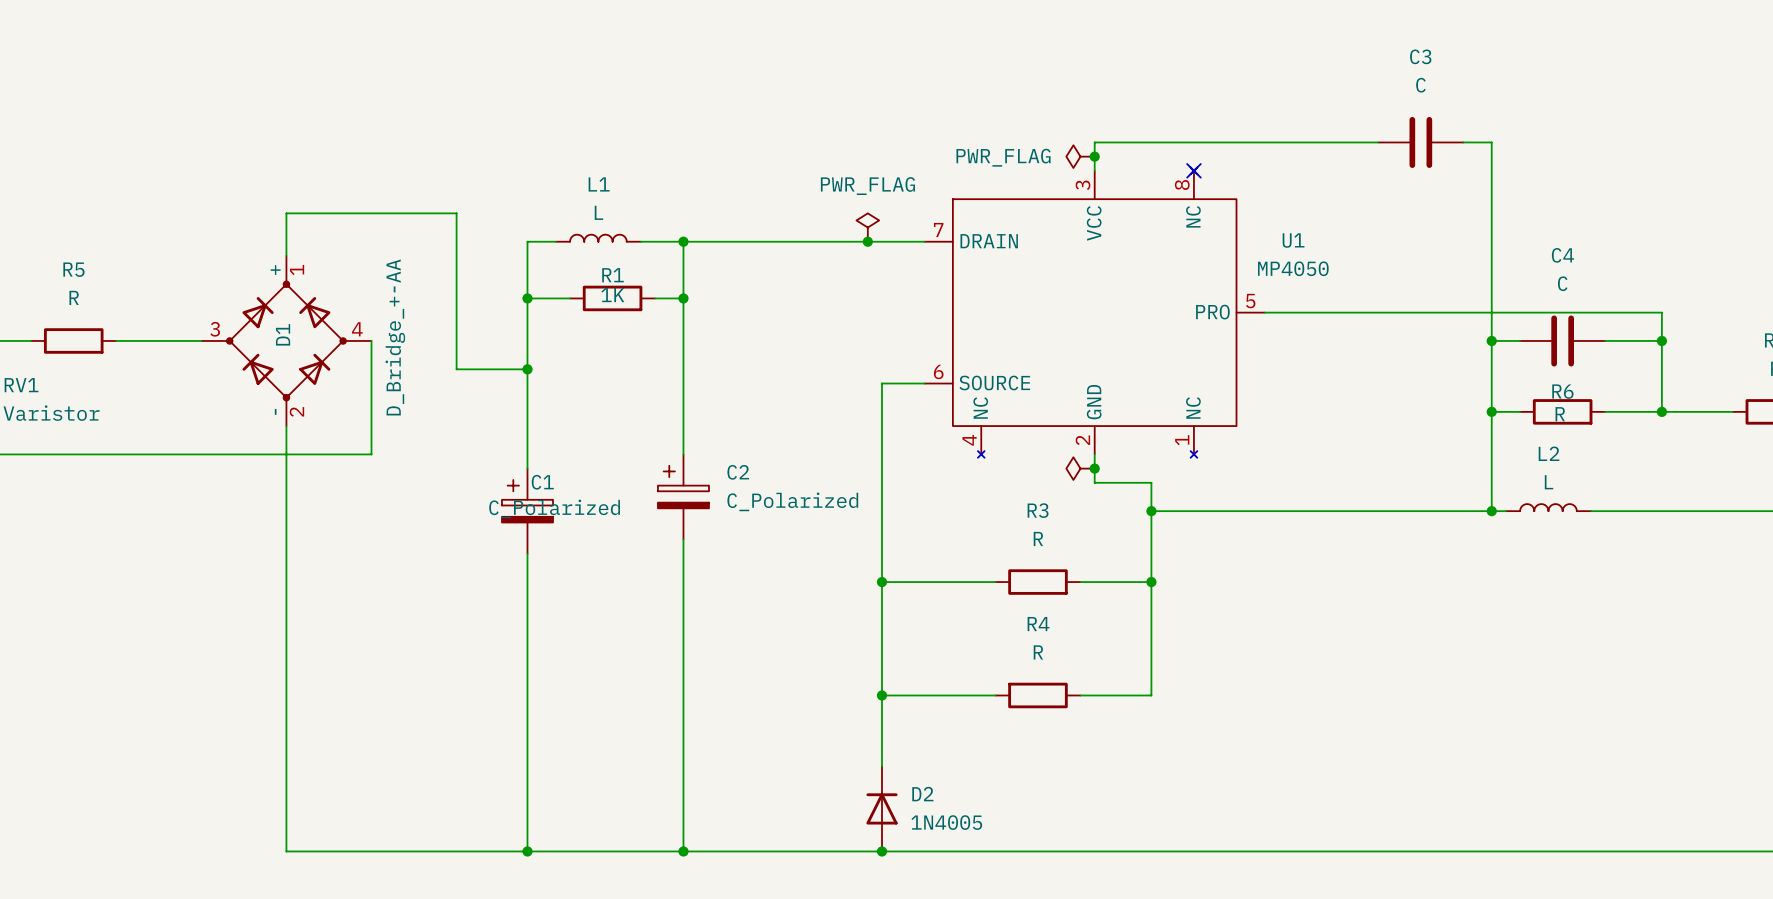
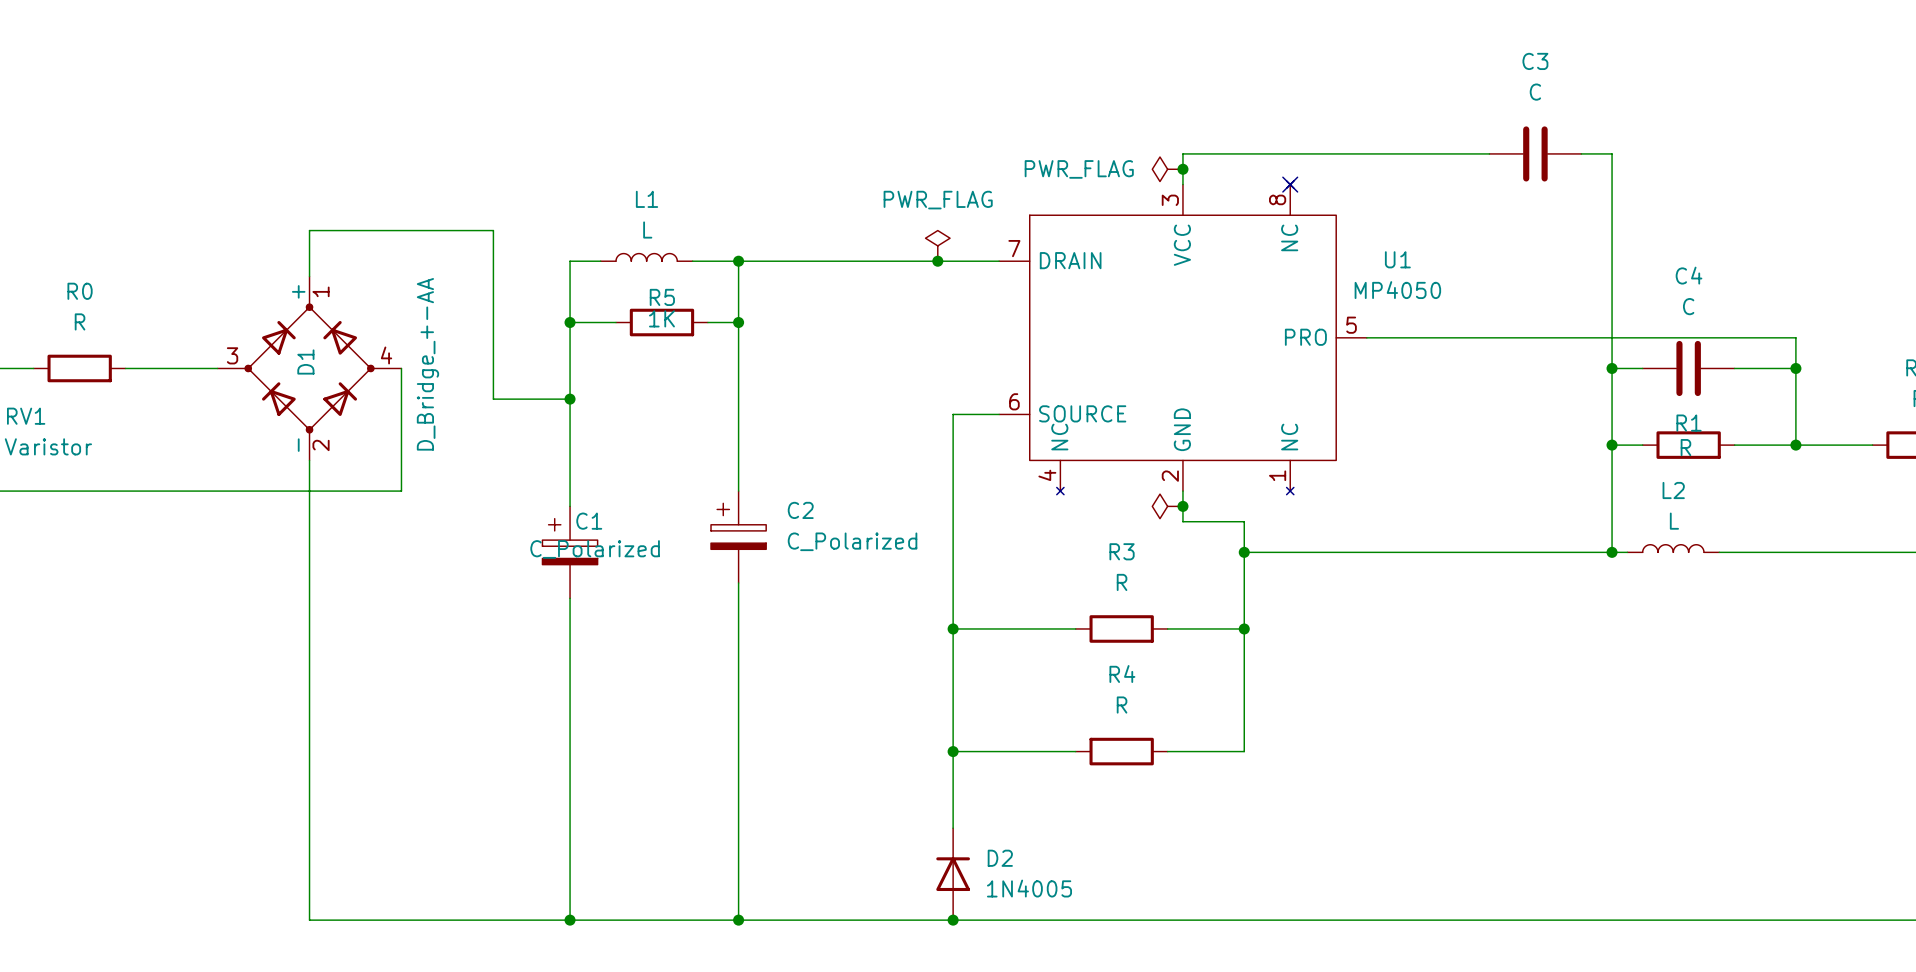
R5 name: R5 (73, 269) -> R0 (80, 291)
R1 name: R1 (613, 275) -> R5 (662, 297)
R6 name: R6 (1562, 391) -> R1 (1689, 423)

